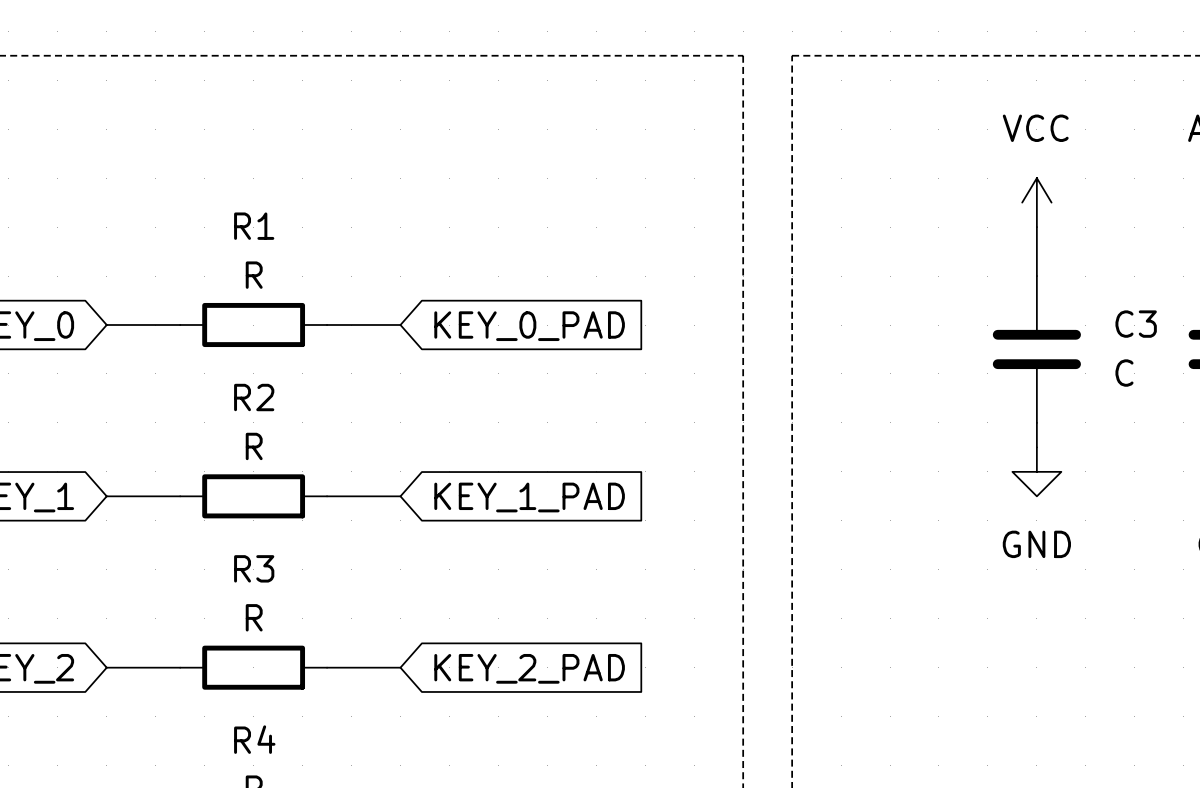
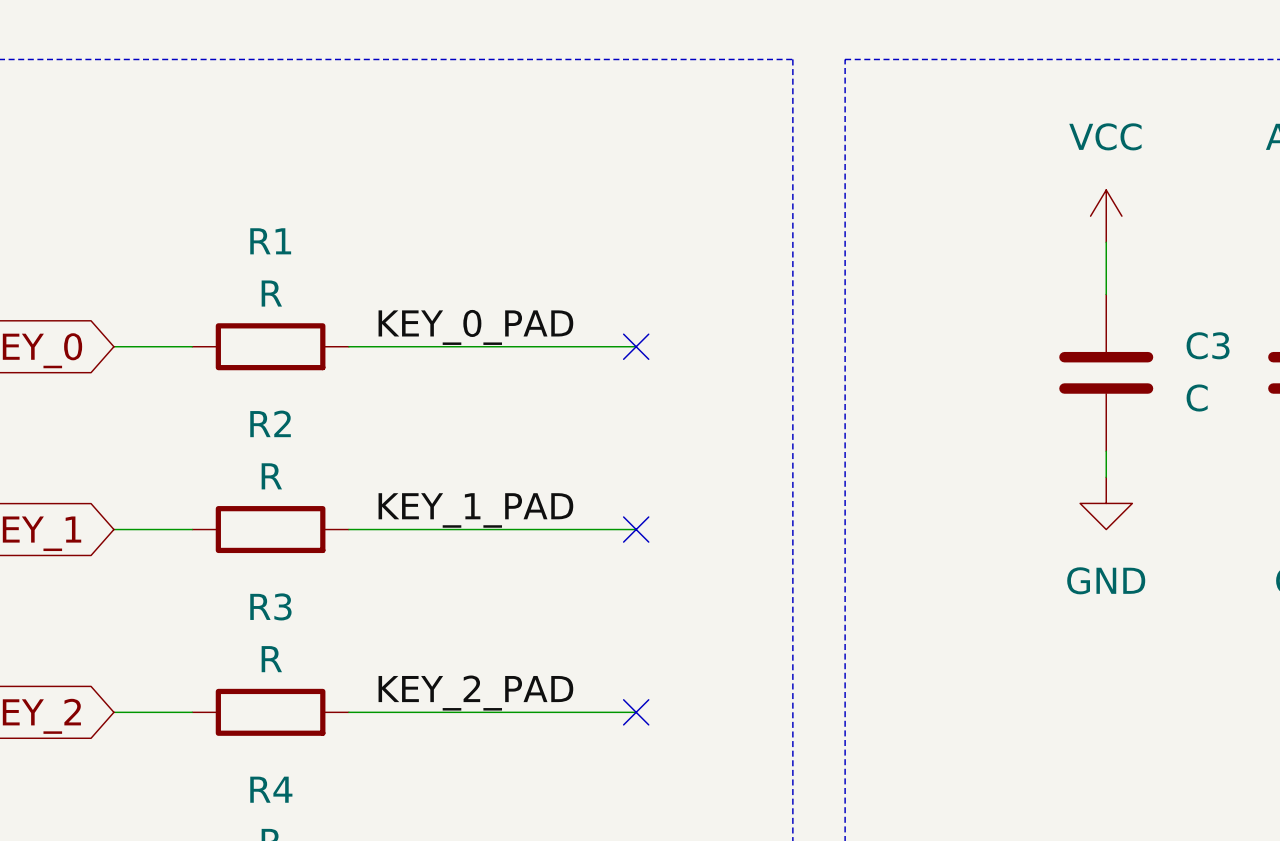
label: none -> KEY_0_PAD (475, 327)
wire: none -> (427, 346) (636, 346)
no-connect mark: none -> (636, 346)
global label: KEY_0_PAD (529, 326) -> none
label: none -> KEY_1_PAD (475, 510)
wire: none -> (427, 529) (636, 529)
no-connect mark: none -> (636, 529)
global label: KEY_1_PAD (529, 497) -> none
label: none -> KEY_2_PAD (475, 693)
wire: none -> (427, 712) (636, 712)
no-connect mark: none -> (636, 712)
global label: KEY_2_PAD (529, 668) -> none

